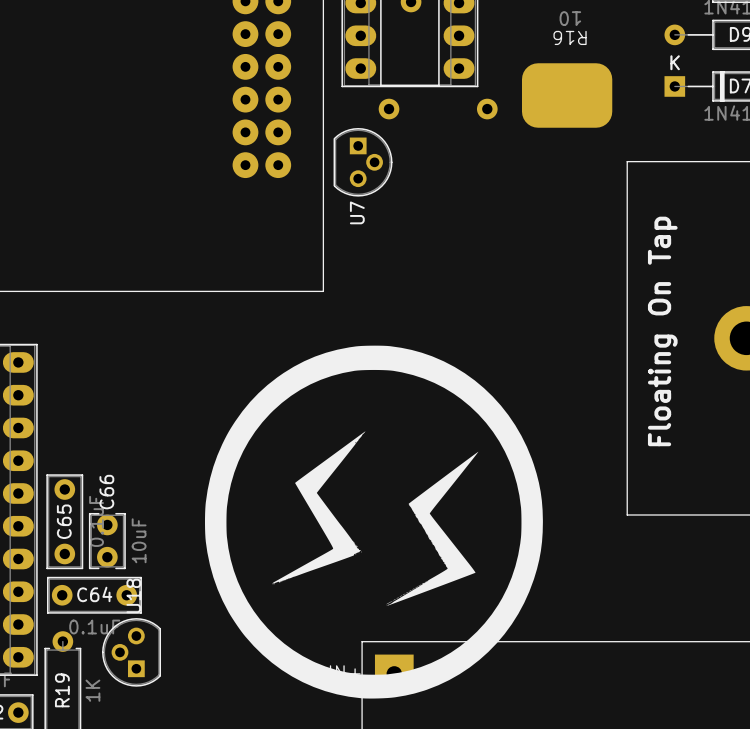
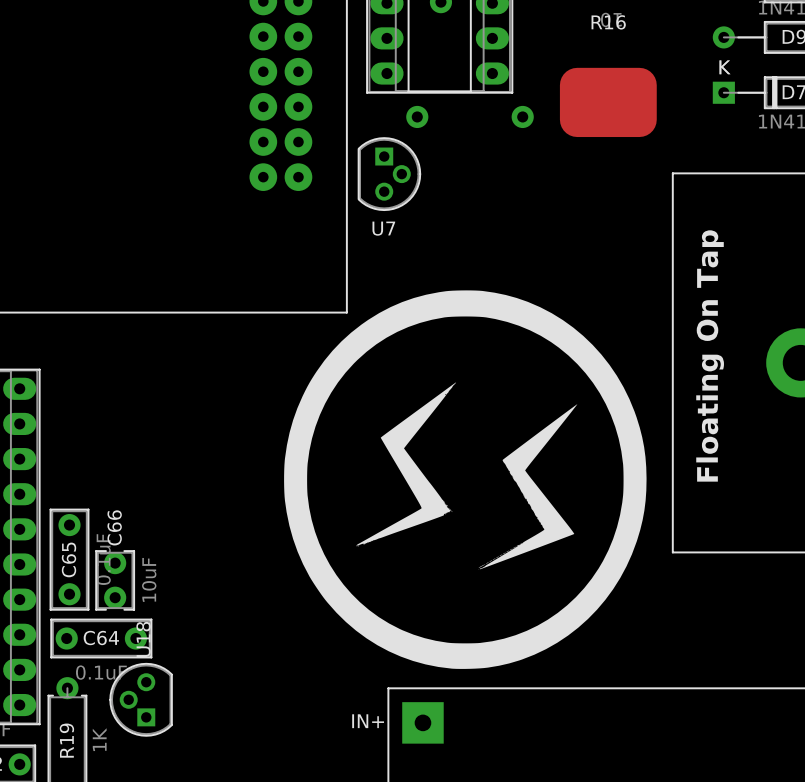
R16 name rotation: 0° (570, 37) -> 180° (608, 22)
U7 name rotation: 0° (357, 212) -> 90° clockwise (383, 228)
drawing position: (373, 522) -> (465, 479)

